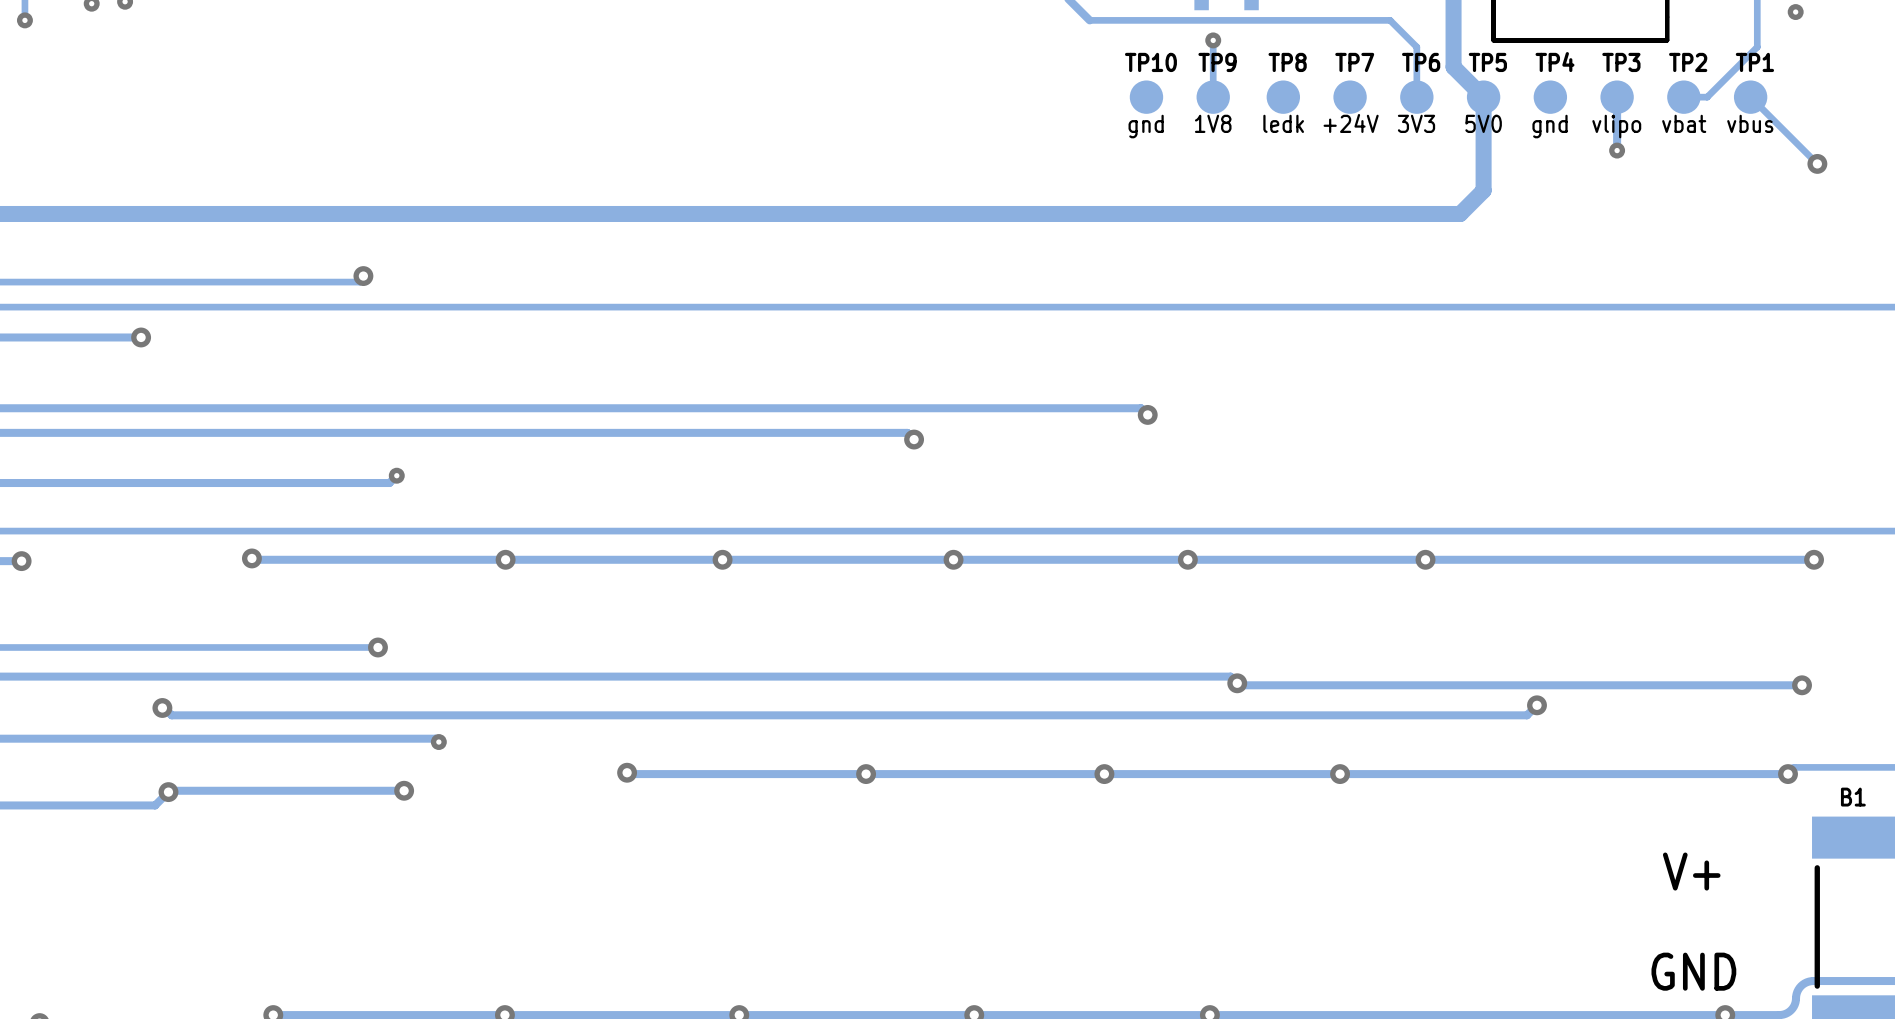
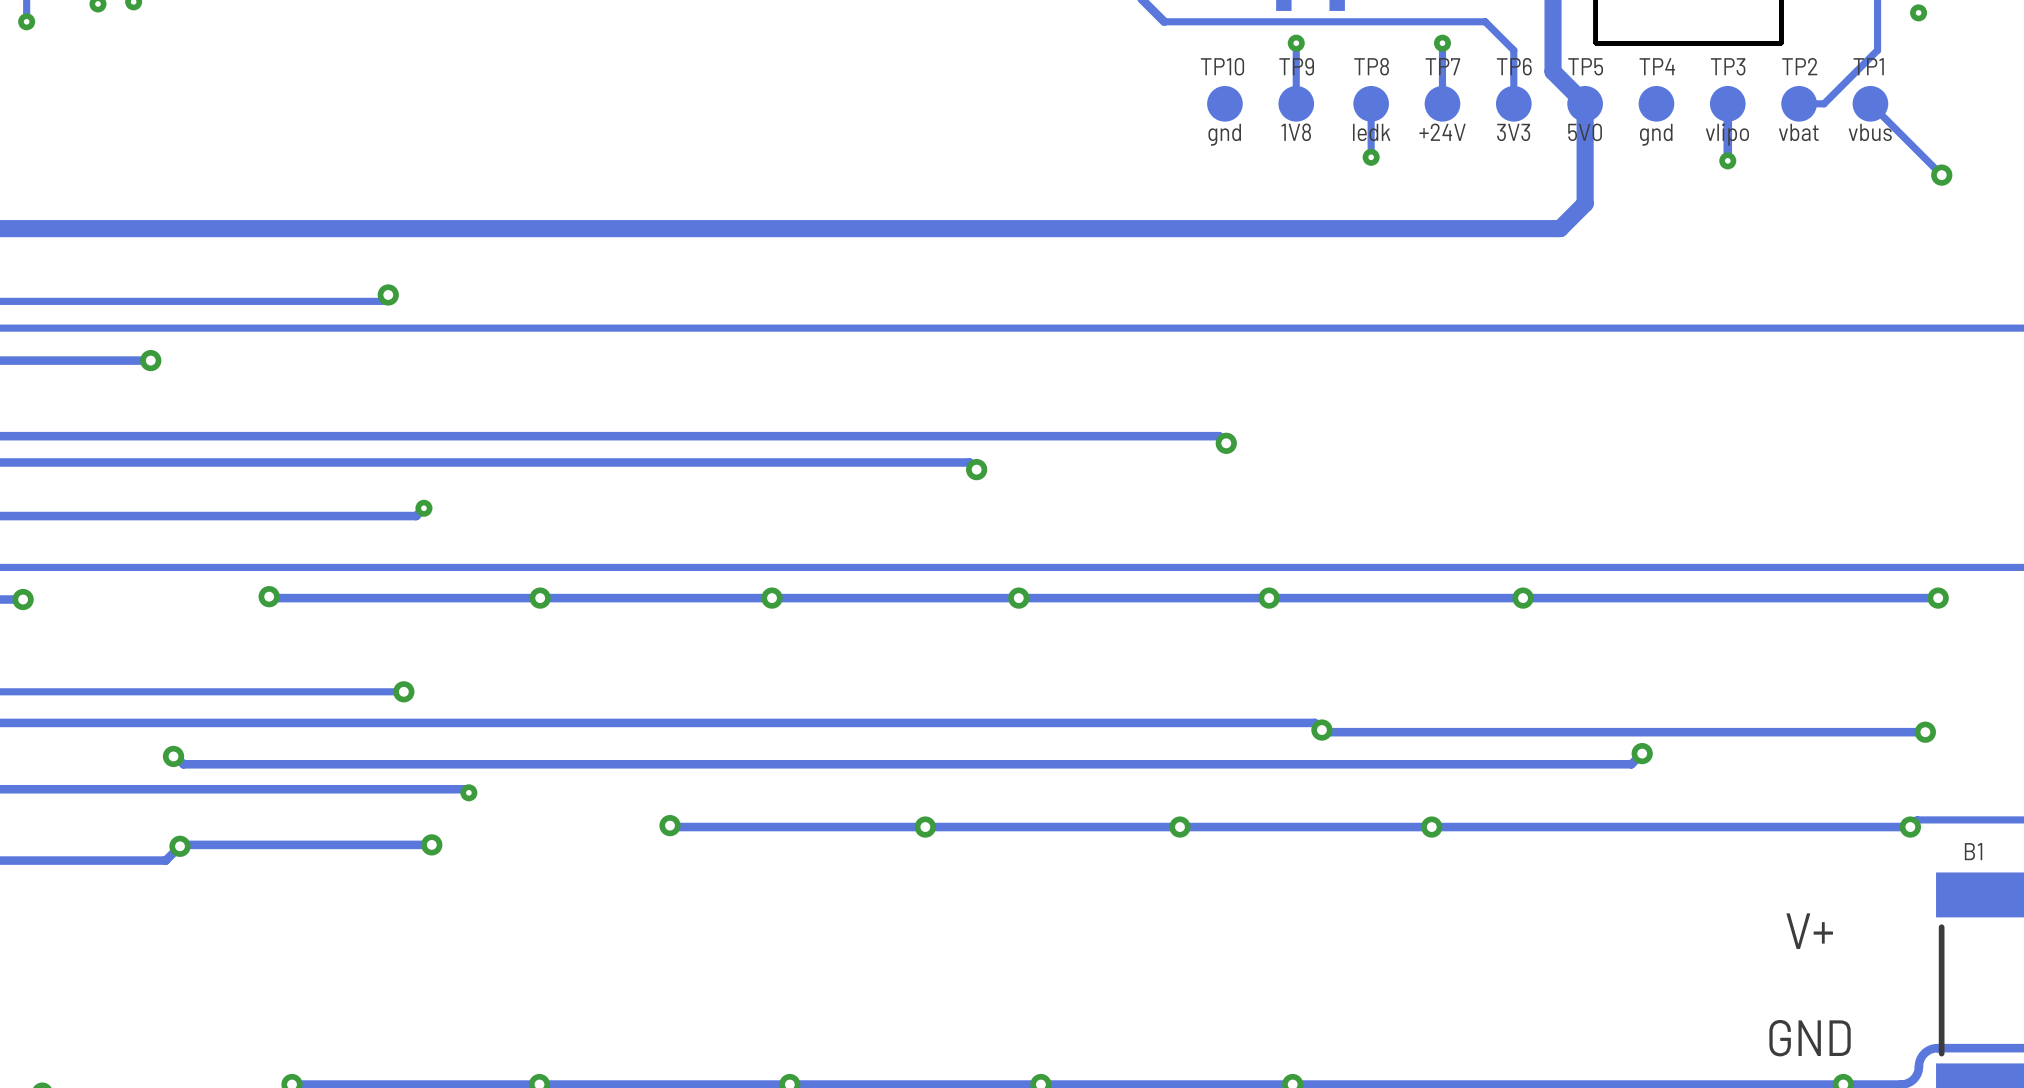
track: none -> (1442, 43) (1442, 103)
via: none -> (1442, 43)
track: none -> (1371, 103) (1371, 157)
via: none -> (1371, 157)

